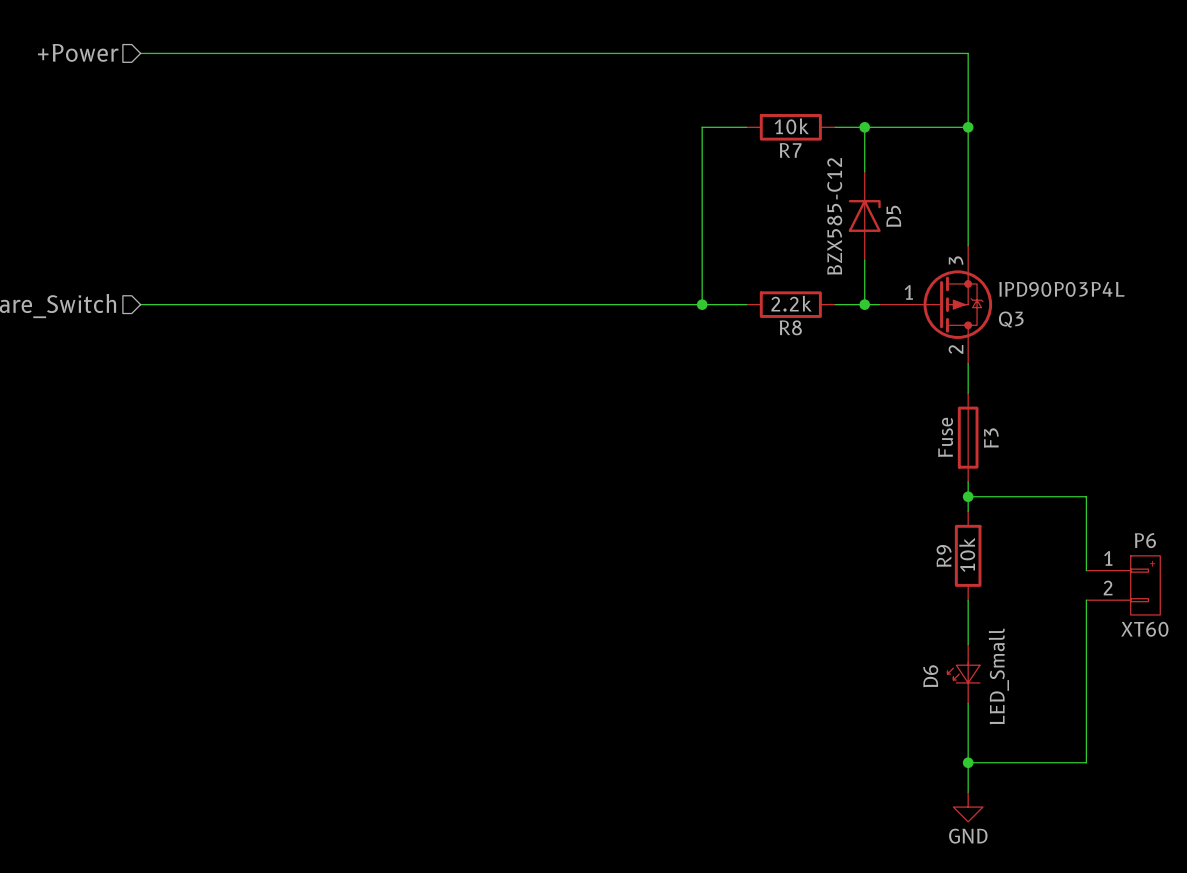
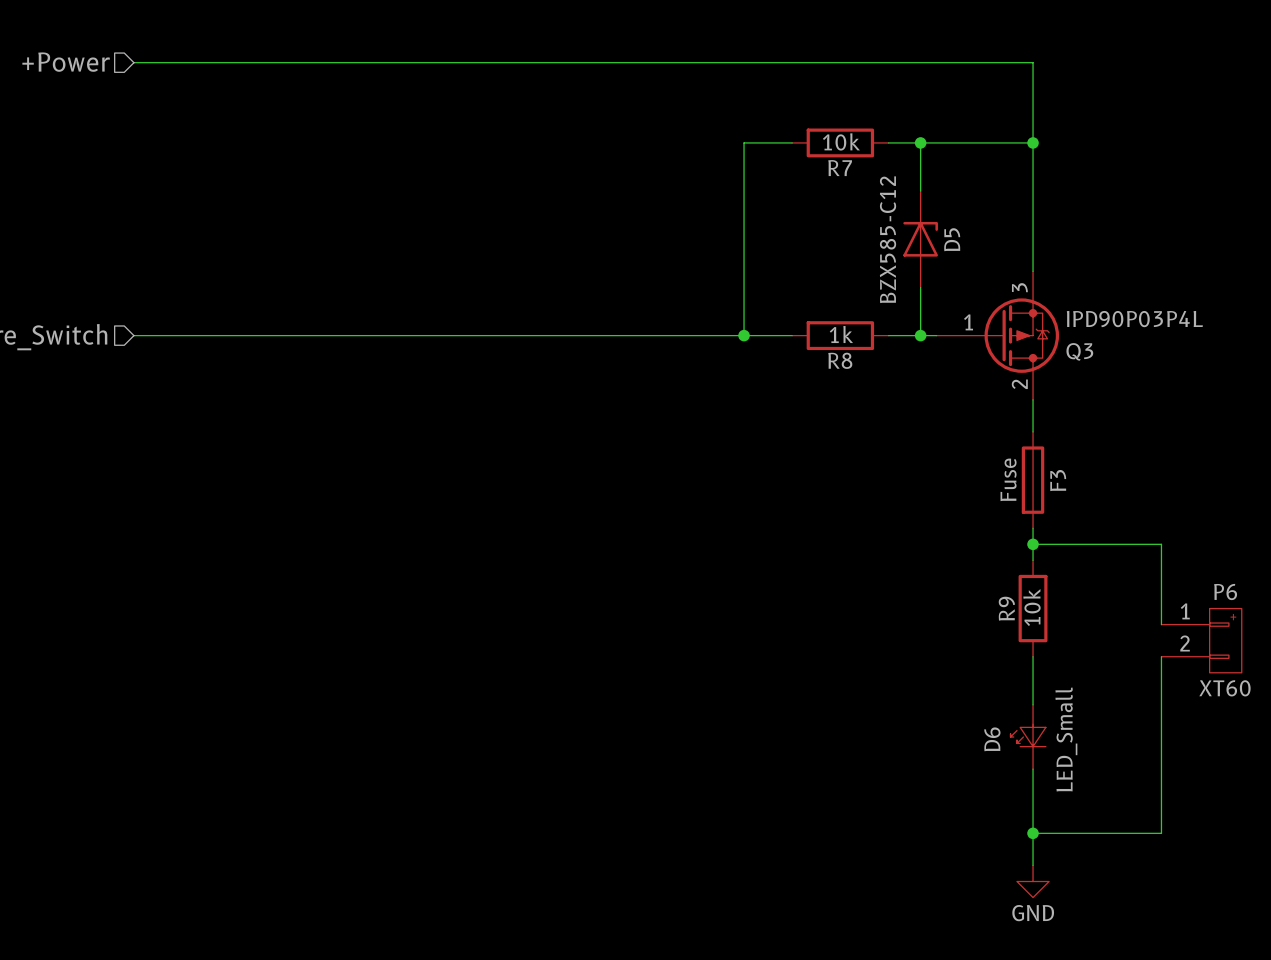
R8 value: 2.2k (791, 303) -> 1k (841, 334)

